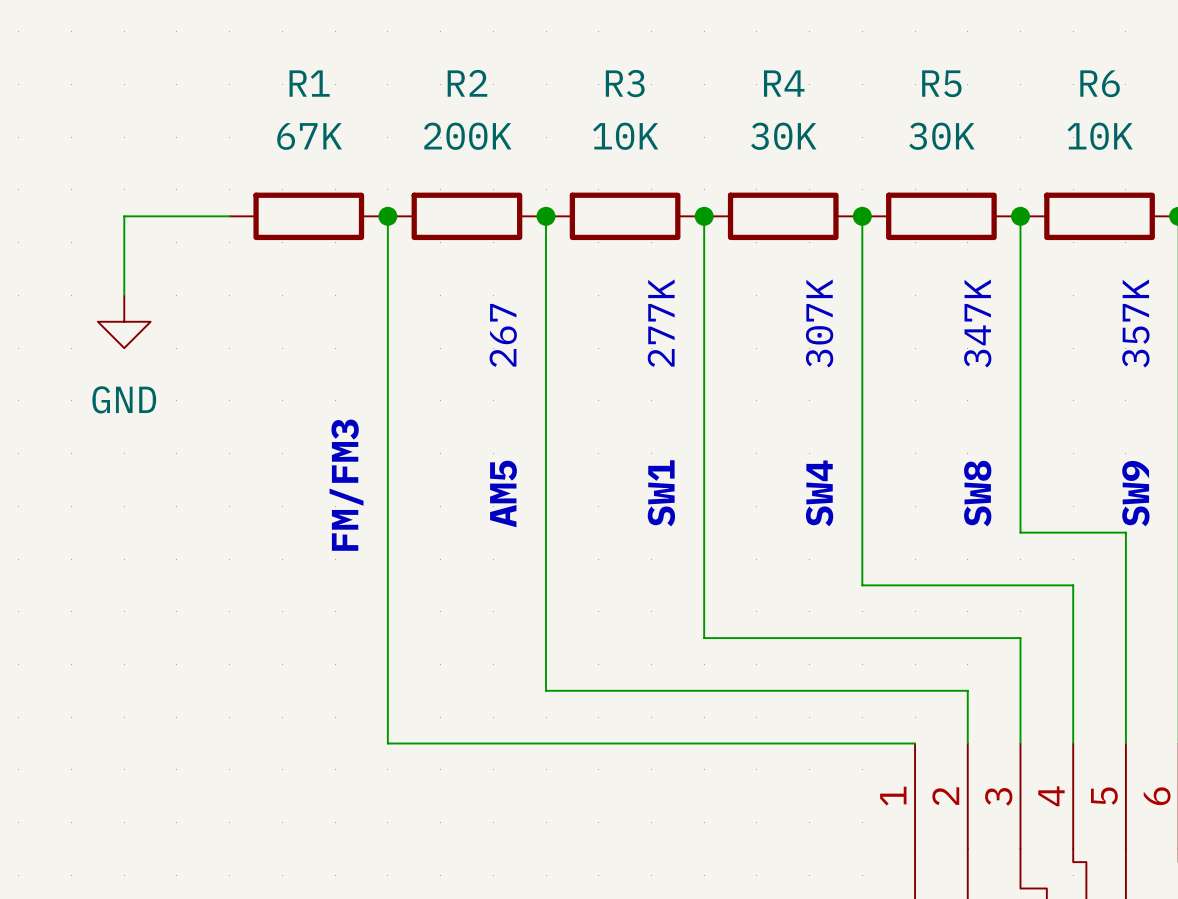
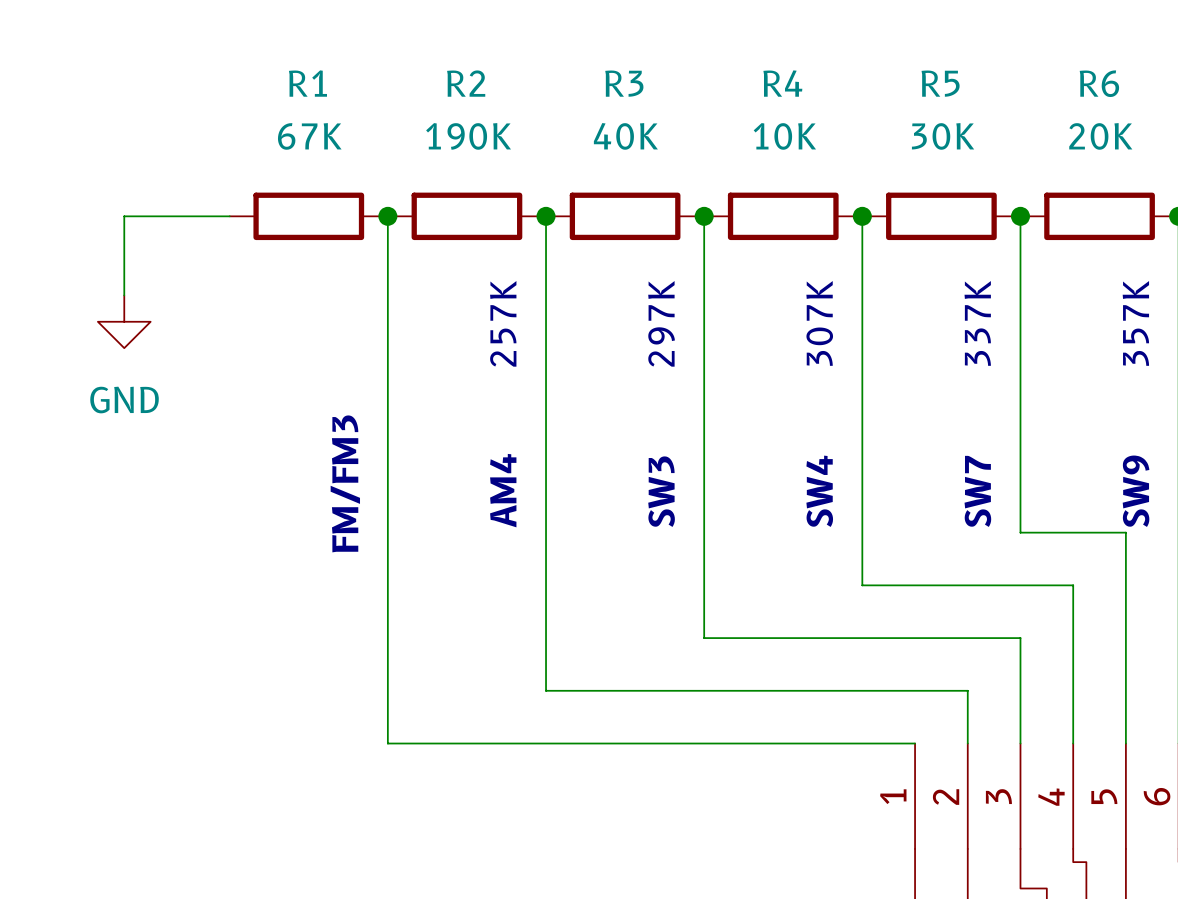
R2 value: 200K (467, 136) -> 190K (468, 136)
R3 value: 10K (625, 136) -> 40K (625, 136)
R4 value: 30K (783, 136) -> 10K (784, 136)
R6 value: 10K (1100, 136) -> 20K (1100, 136)
text: 277K (661, 323) -> 297K (661, 323)
text: 347K (977, 323) -> 337K (977, 323)
text: 267 (503, 335) -> 257K (503, 323)
text: AM5 (503, 493) -> AM4 (503, 490)
text: SW1 (661, 493) -> SW3 (661, 491)
text: SW8 (977, 493) -> SW7 (977, 491)

